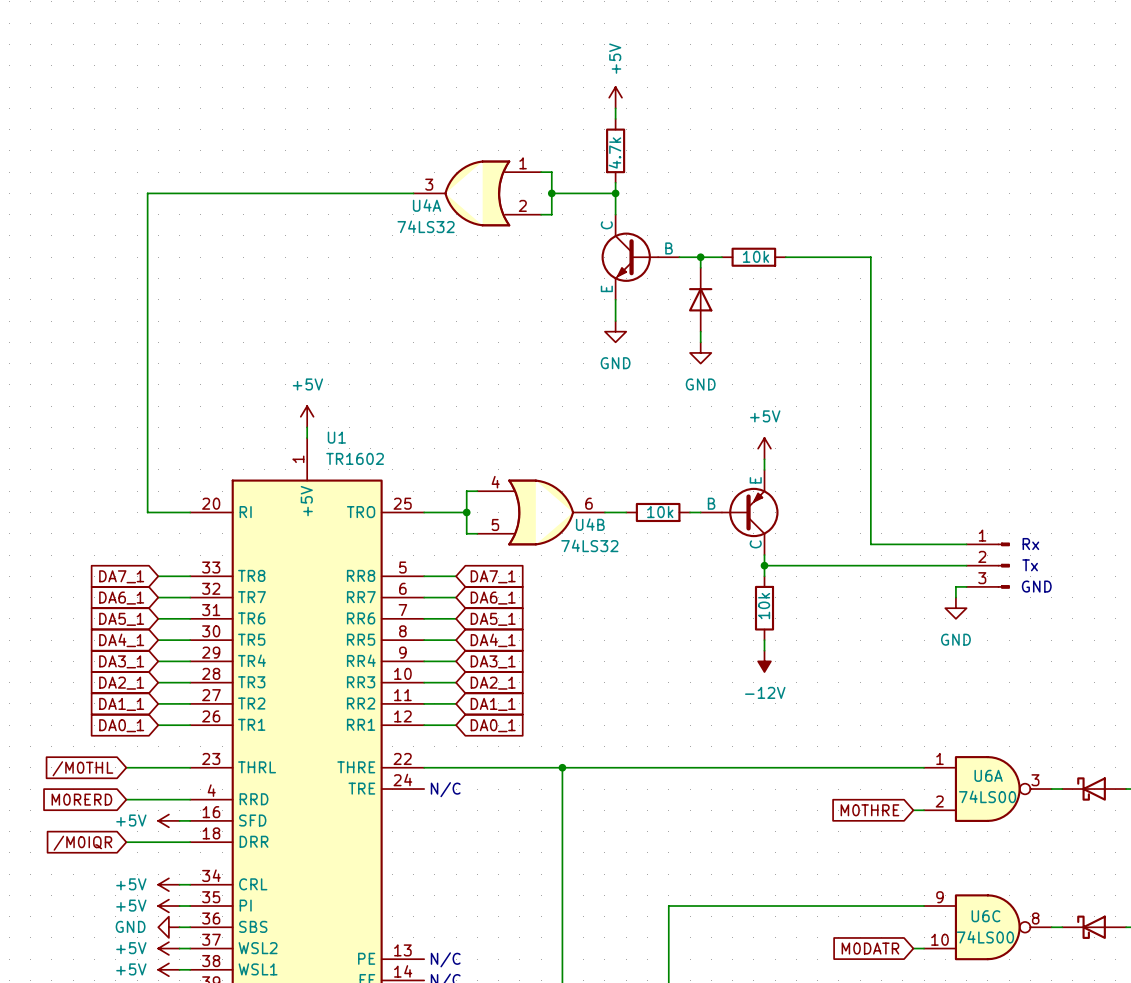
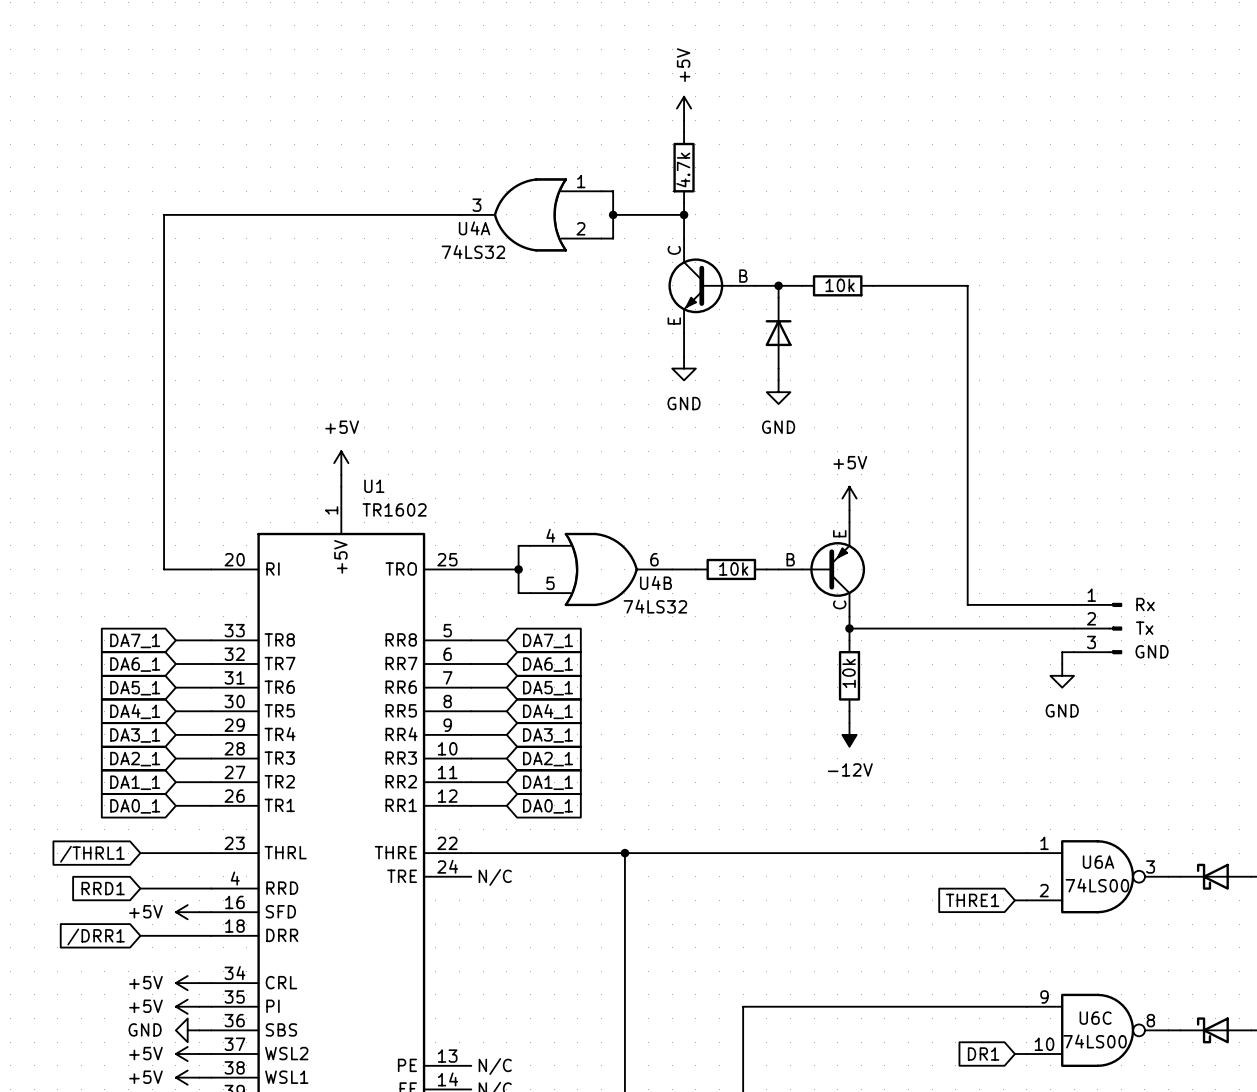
global label: /M0THL (82, 768) -> /THRL1 (92, 854)
global label: M0RERD (81, 799) -> RRD1 (103, 888)
global label: M0THRE (869, 810) -> THRE1 (972, 900)
global label: /M0IQR (82, 843) -> /DRR1 (96, 936)
global label: M0DATR (870, 948) -> DR1 (983, 1054)

